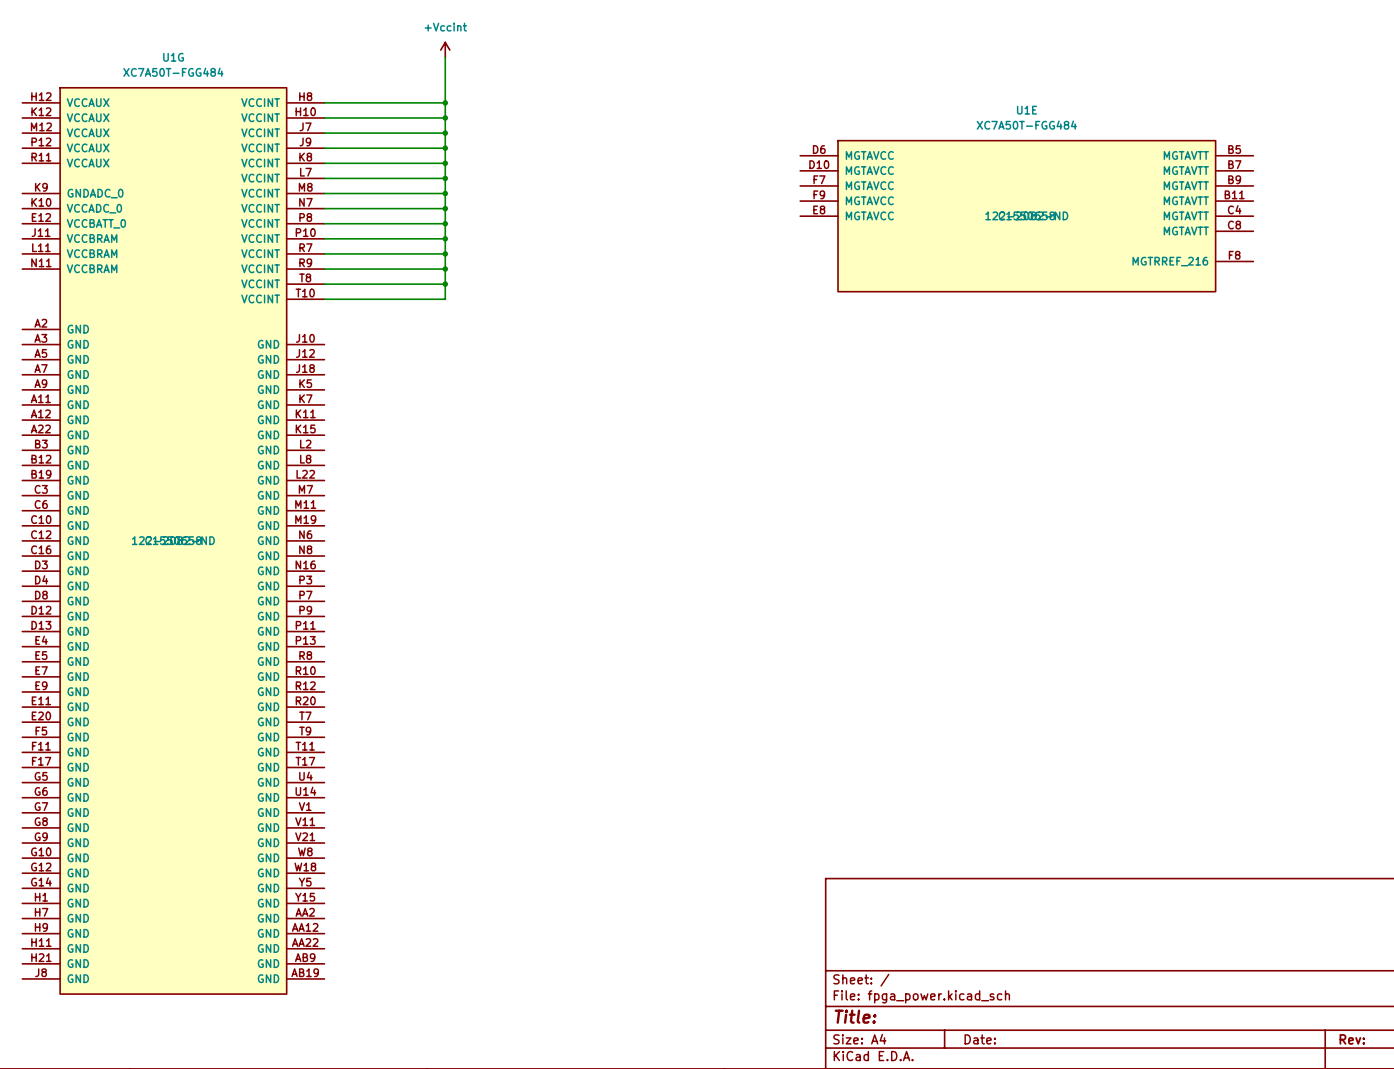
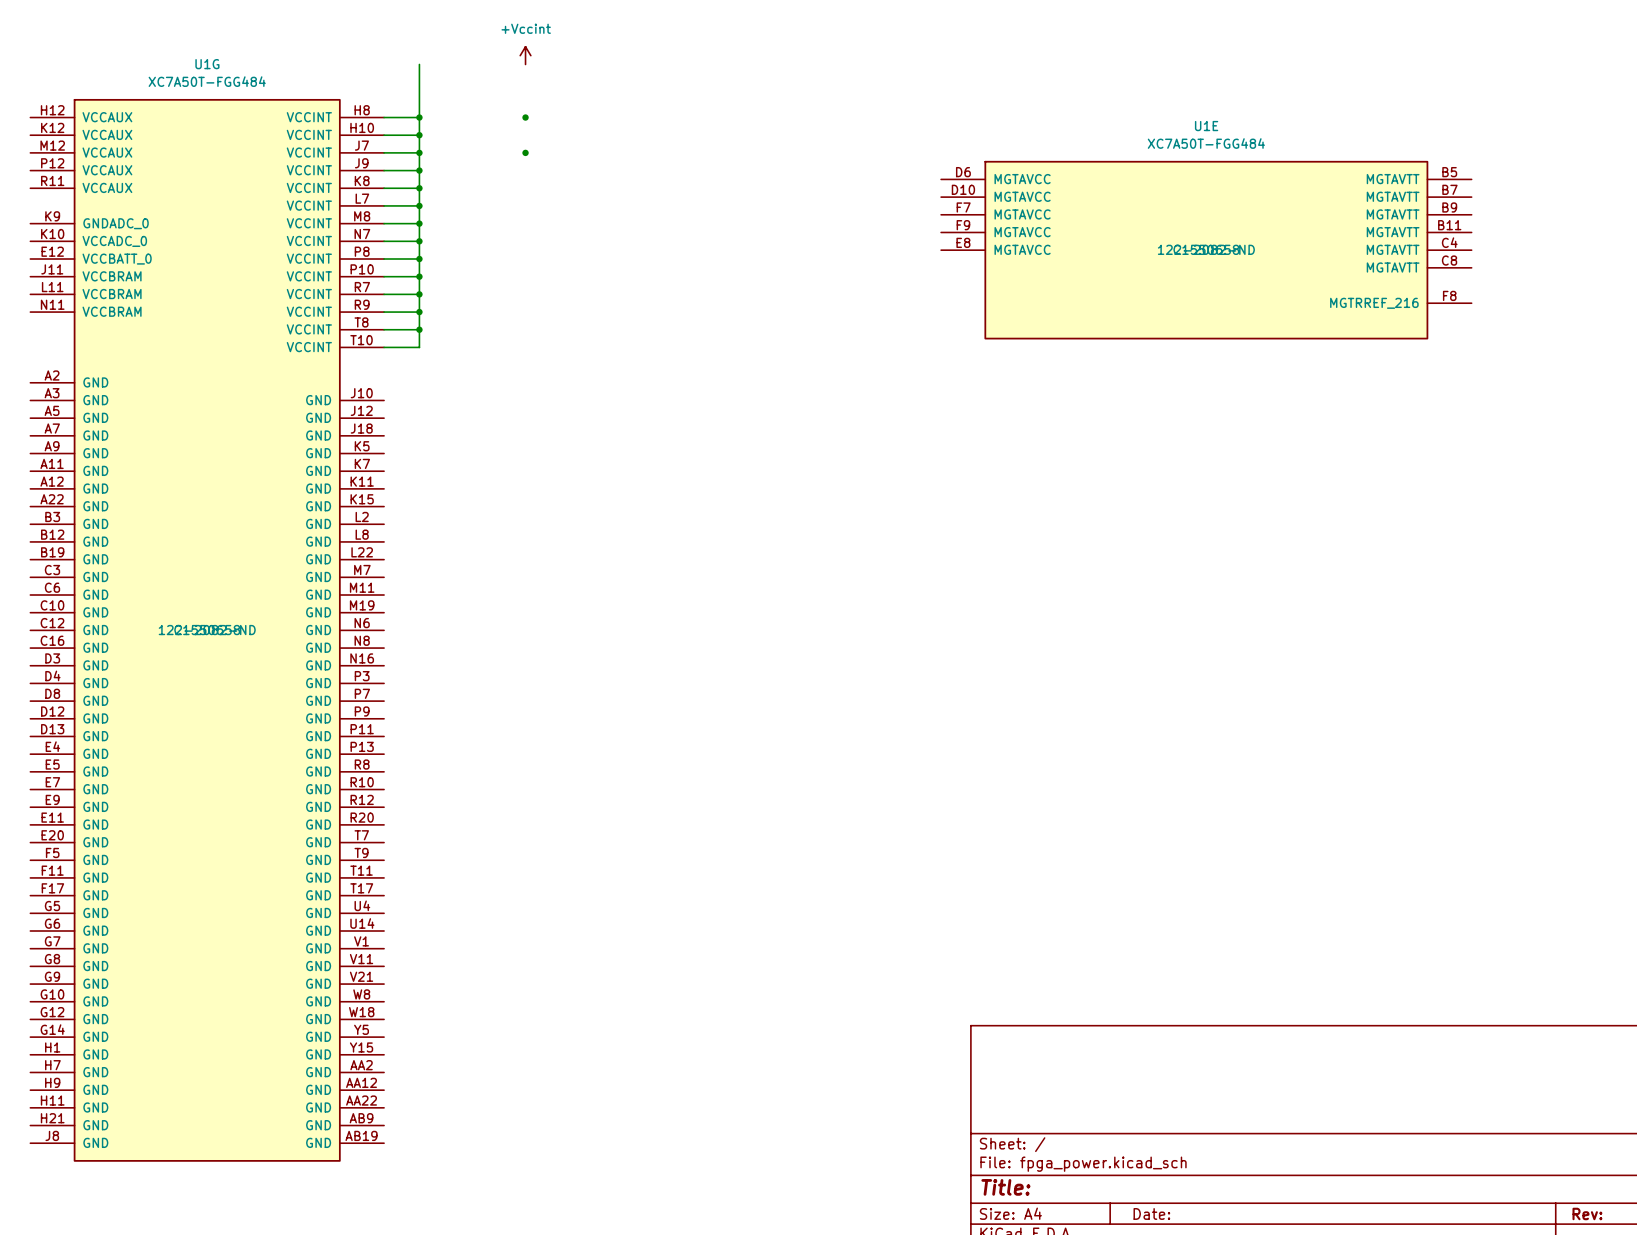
wire: (445, 57) (445, 299) (354, 299) -> (419, 64) (419, 347)
wire: (354, 102) (445, 102) -> none
junction: none -> (419, 117)
wire: (354, 117) (445, 117) -> none
junction: none -> (419, 135)
junction: (445, 117) -> none
wire: (354, 133) (445, 133) -> none
junction: none -> (419, 152)
wire: (354, 148) (445, 148) -> none
junction: none -> (419, 170)
junction: (445, 148) -> none
wire: (354, 163) (445, 163) -> none
junction: none -> (419, 188)
junction: (445, 163) -> none
wire: (354, 178) (445, 178) -> none
junction: none -> (419, 205)
junction: (445, 178) -> none
wire: (354, 193) (445, 193) -> none
junction: none -> (419, 223)
junction: (445, 193) -> none
wire: (354, 208) (445, 208) -> none
junction: none -> (419, 241)
junction: (445, 208) -> none
wire: (354, 223) (445, 223) -> none
junction: none -> (419, 259)
junction: (445, 223) -> none
wire: (354, 238) (445, 238) -> none
junction: none -> (419, 276)
junction: (445, 238) -> none
wire: (354, 253) (445, 253) -> none
junction: none -> (419, 294)
junction: (445, 253) -> none
wire: (354, 269) (445, 269) -> none
junction: none -> (419, 312)
junction: (445, 269) -> none
wire: (354, 284) (445, 284) -> none
junction: none -> (419, 329)
junction: (445, 284) -> none

